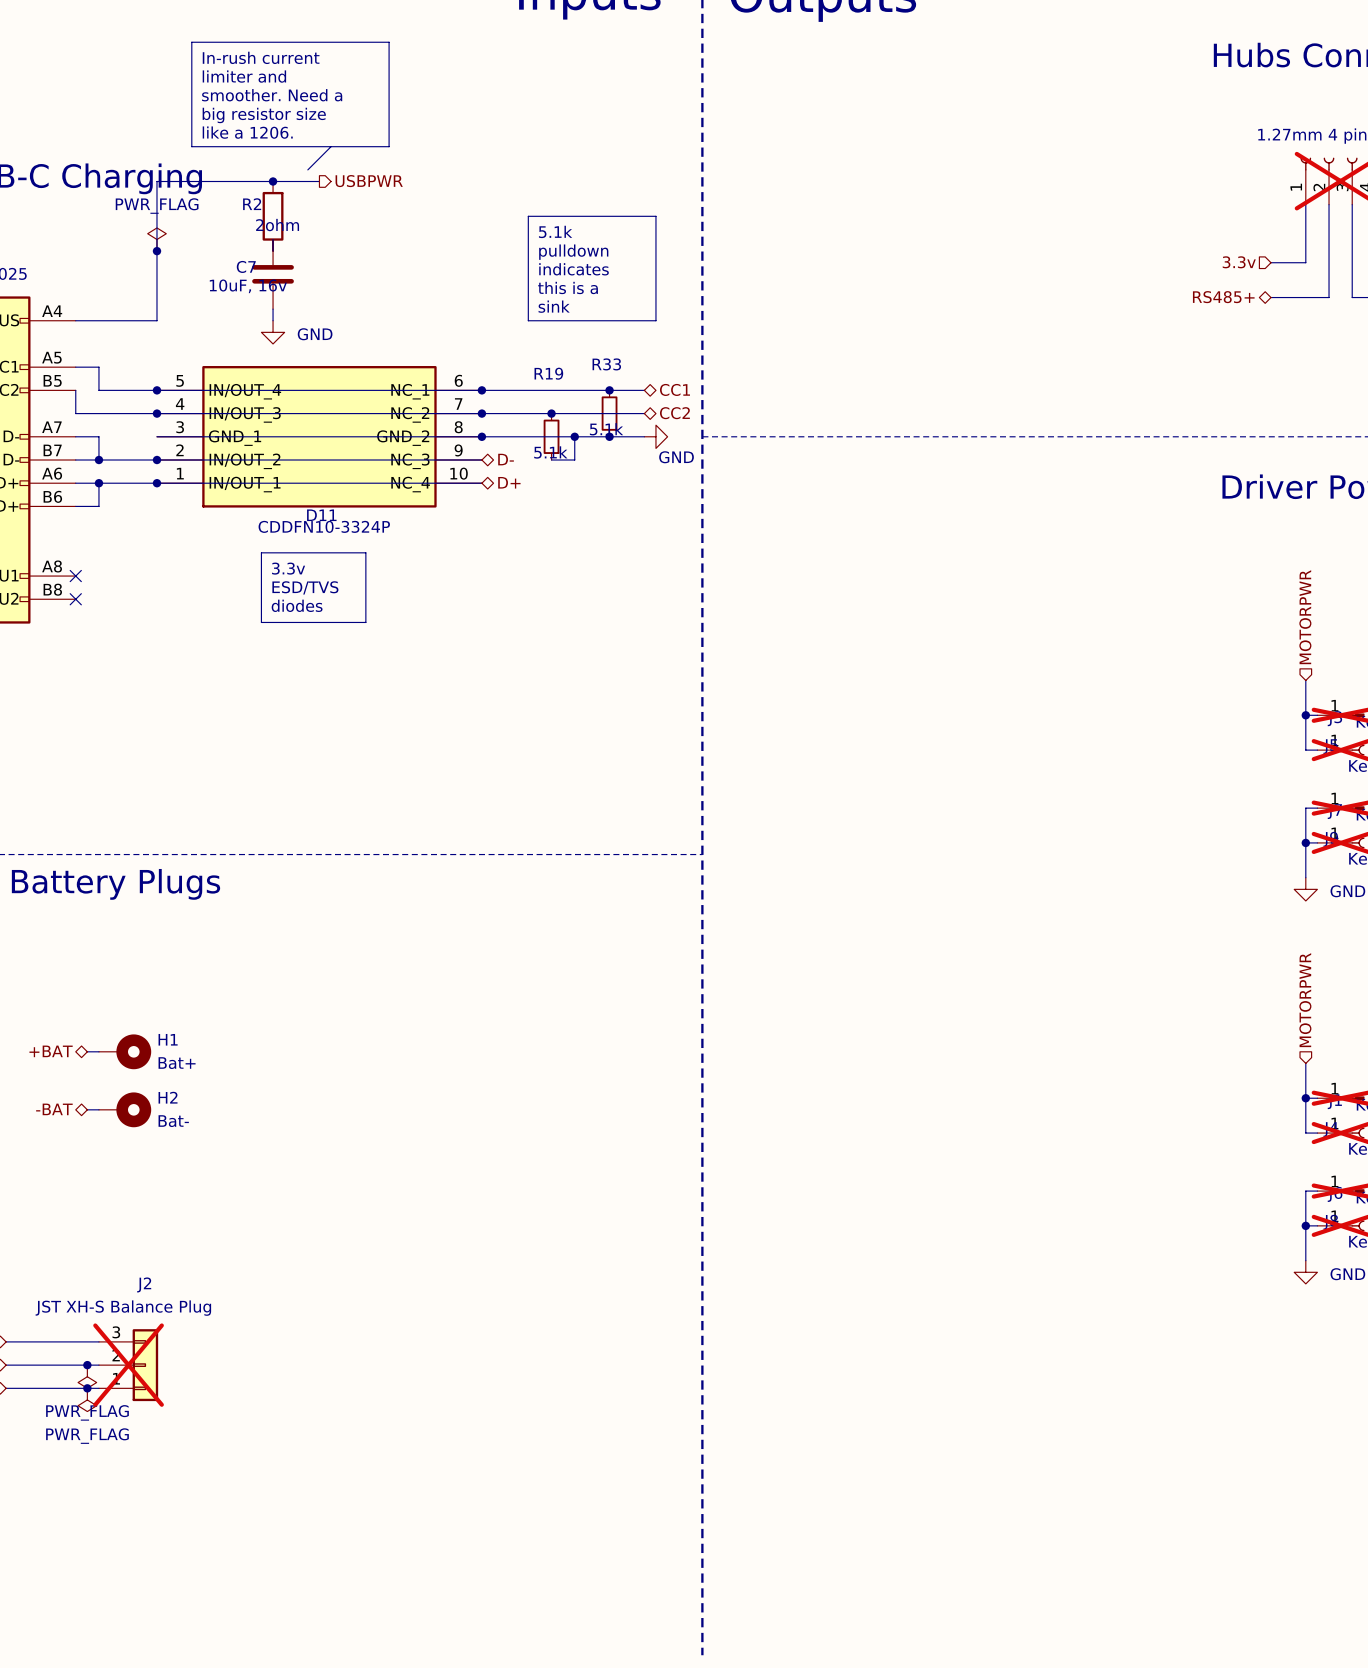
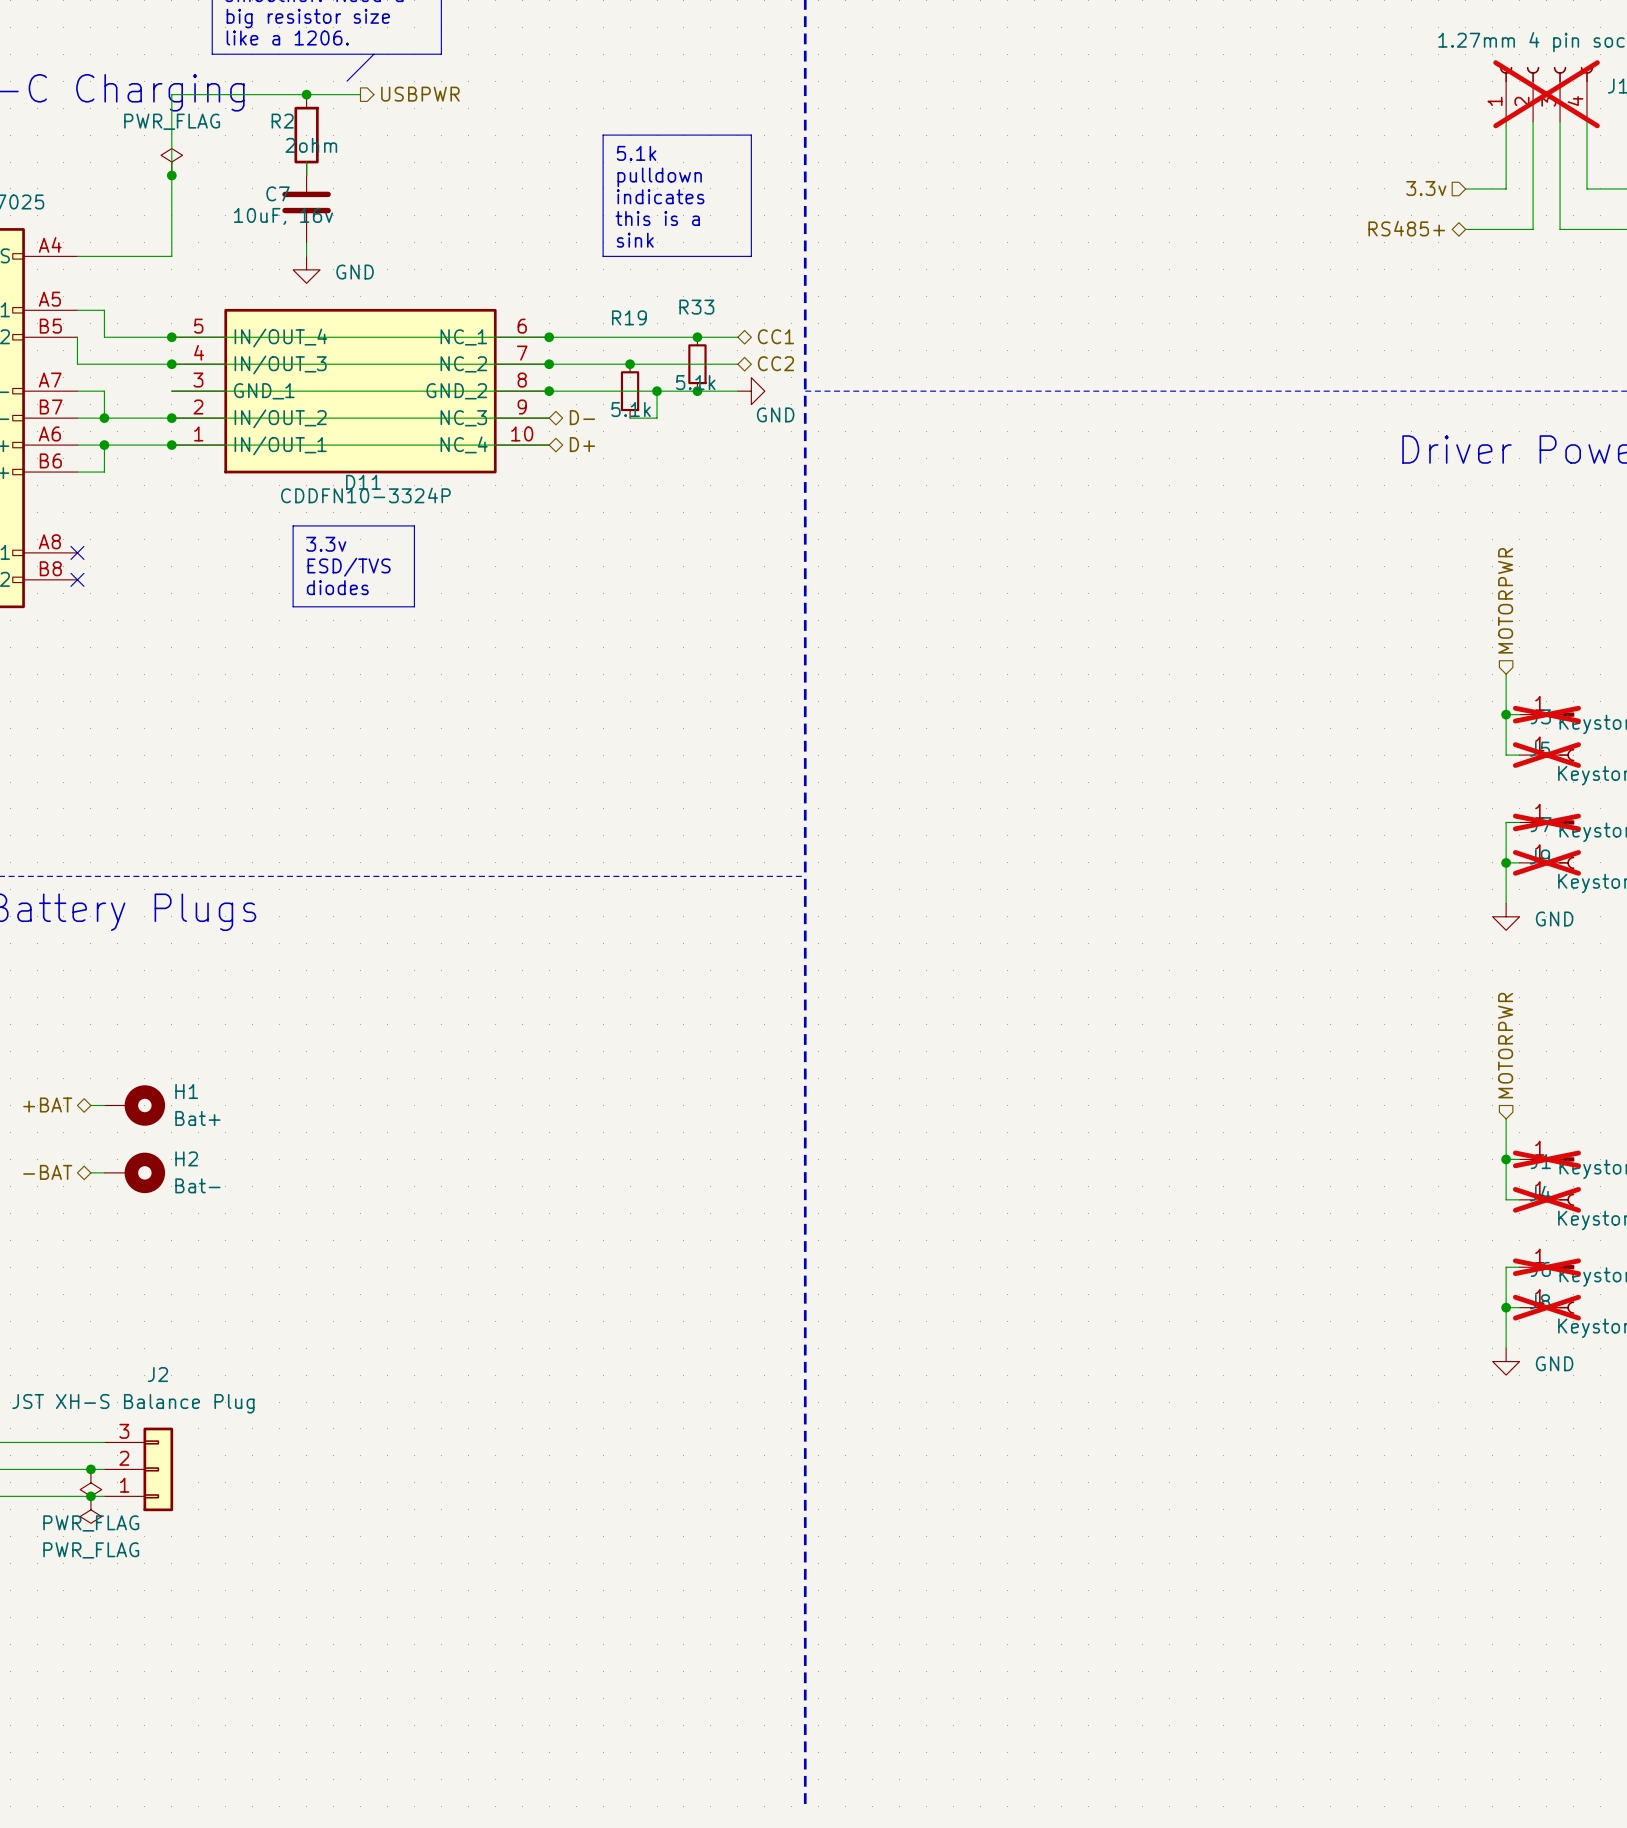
J2 do-not-place cross: (128, 1365) -> none

